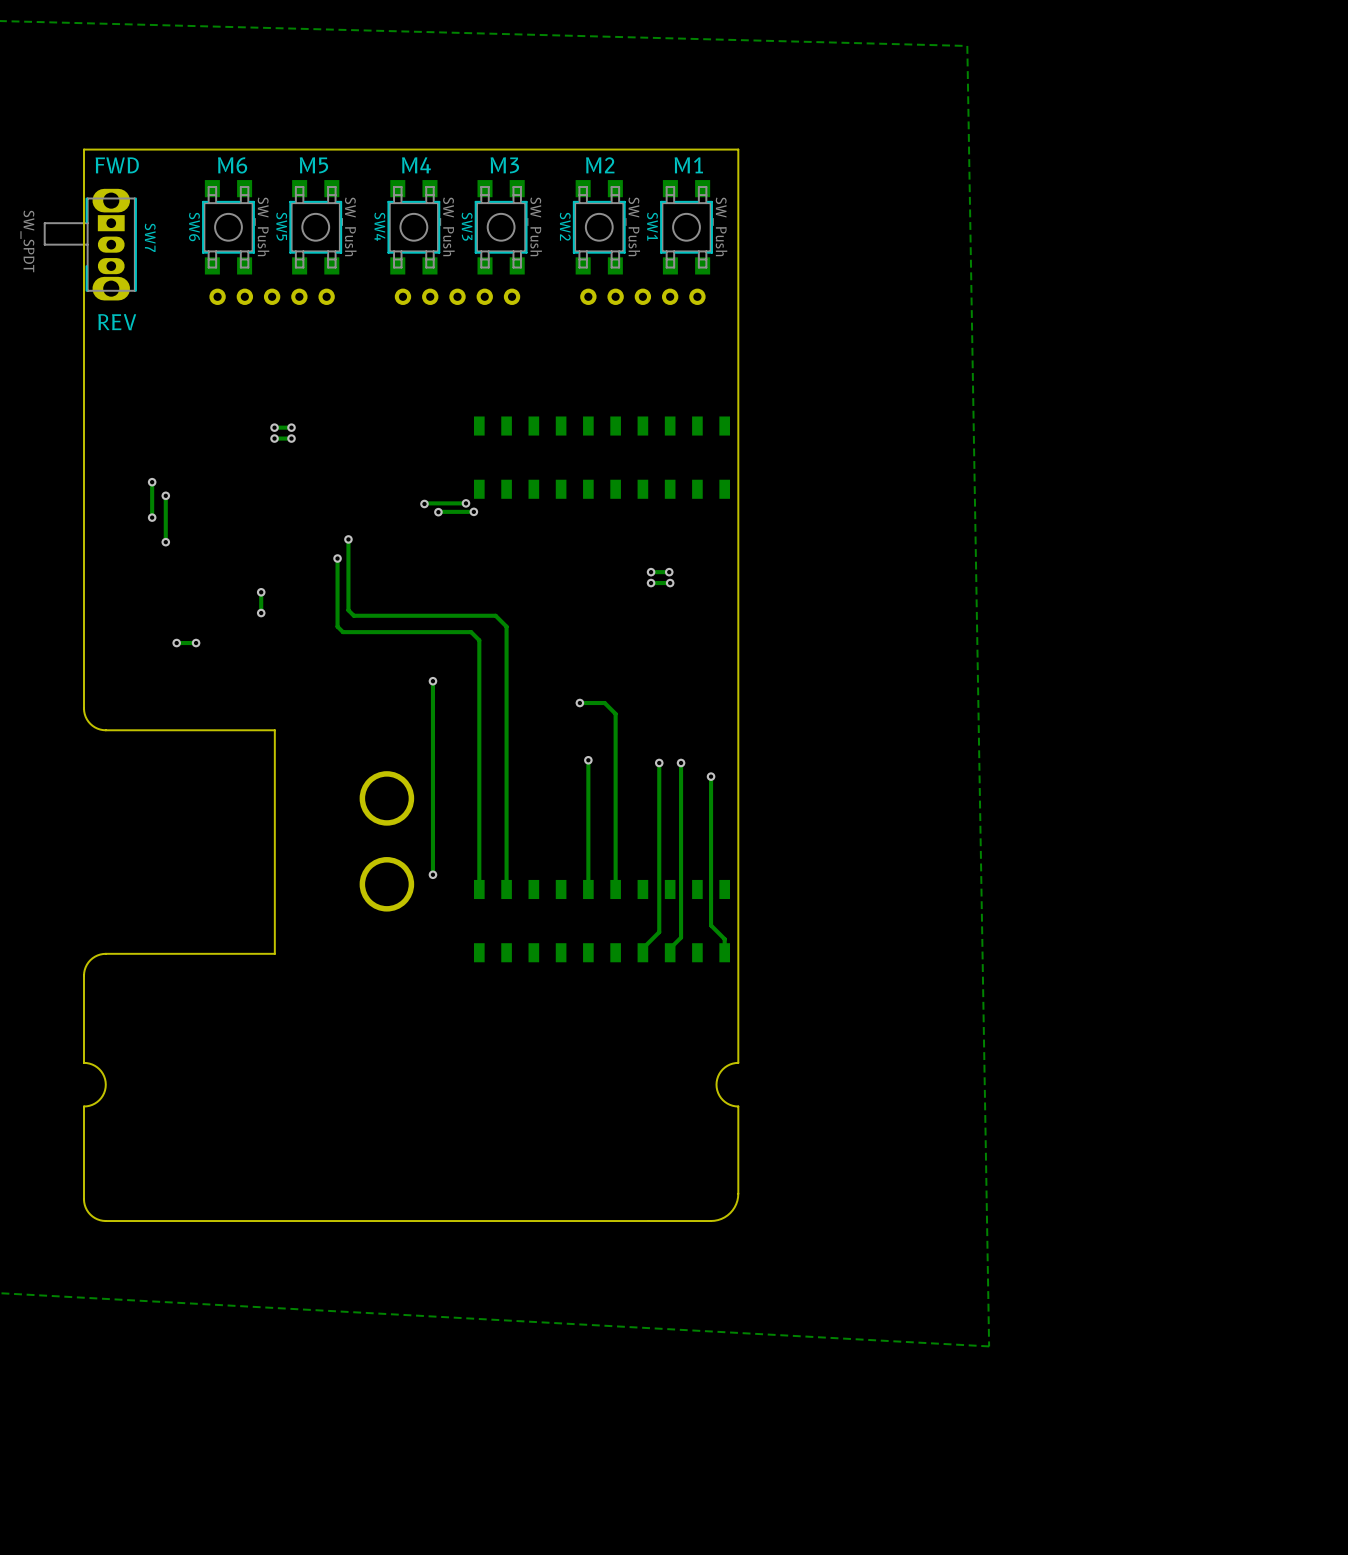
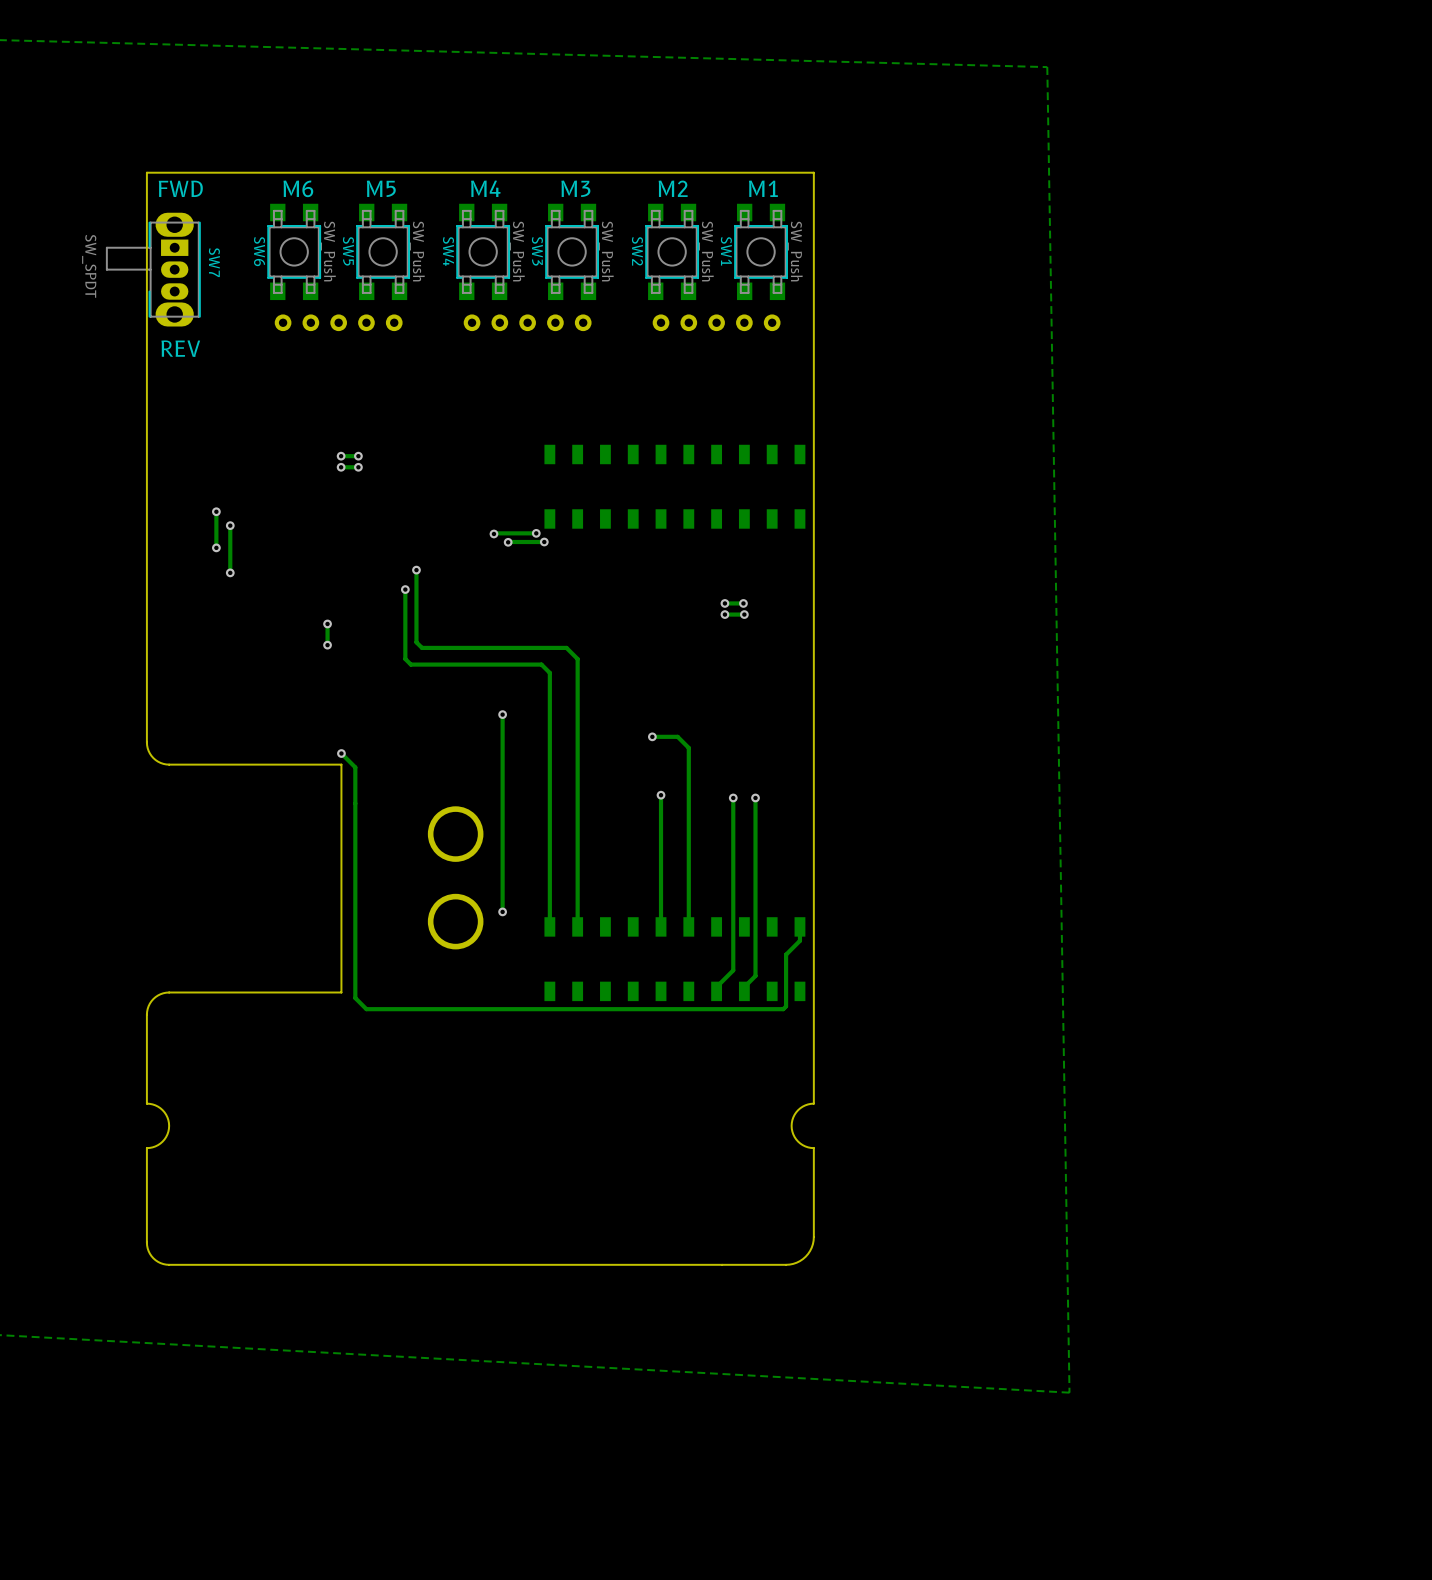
via: (176, 643) -> none
track: (196, 643) (176, 643) -> none
via: (196, 643) -> none
via: none -> (341, 753)
track: (711, 776) (711, 916) -> (799, 926) (799, 940) (786, 954)
via: (711, 776) -> none
track: (711, 925) (724, 939) (724, 952) -> (786, 963) (786, 1006) (783, 1009) (366, 1009) (355, 998) (355, 767) (341, 753)

